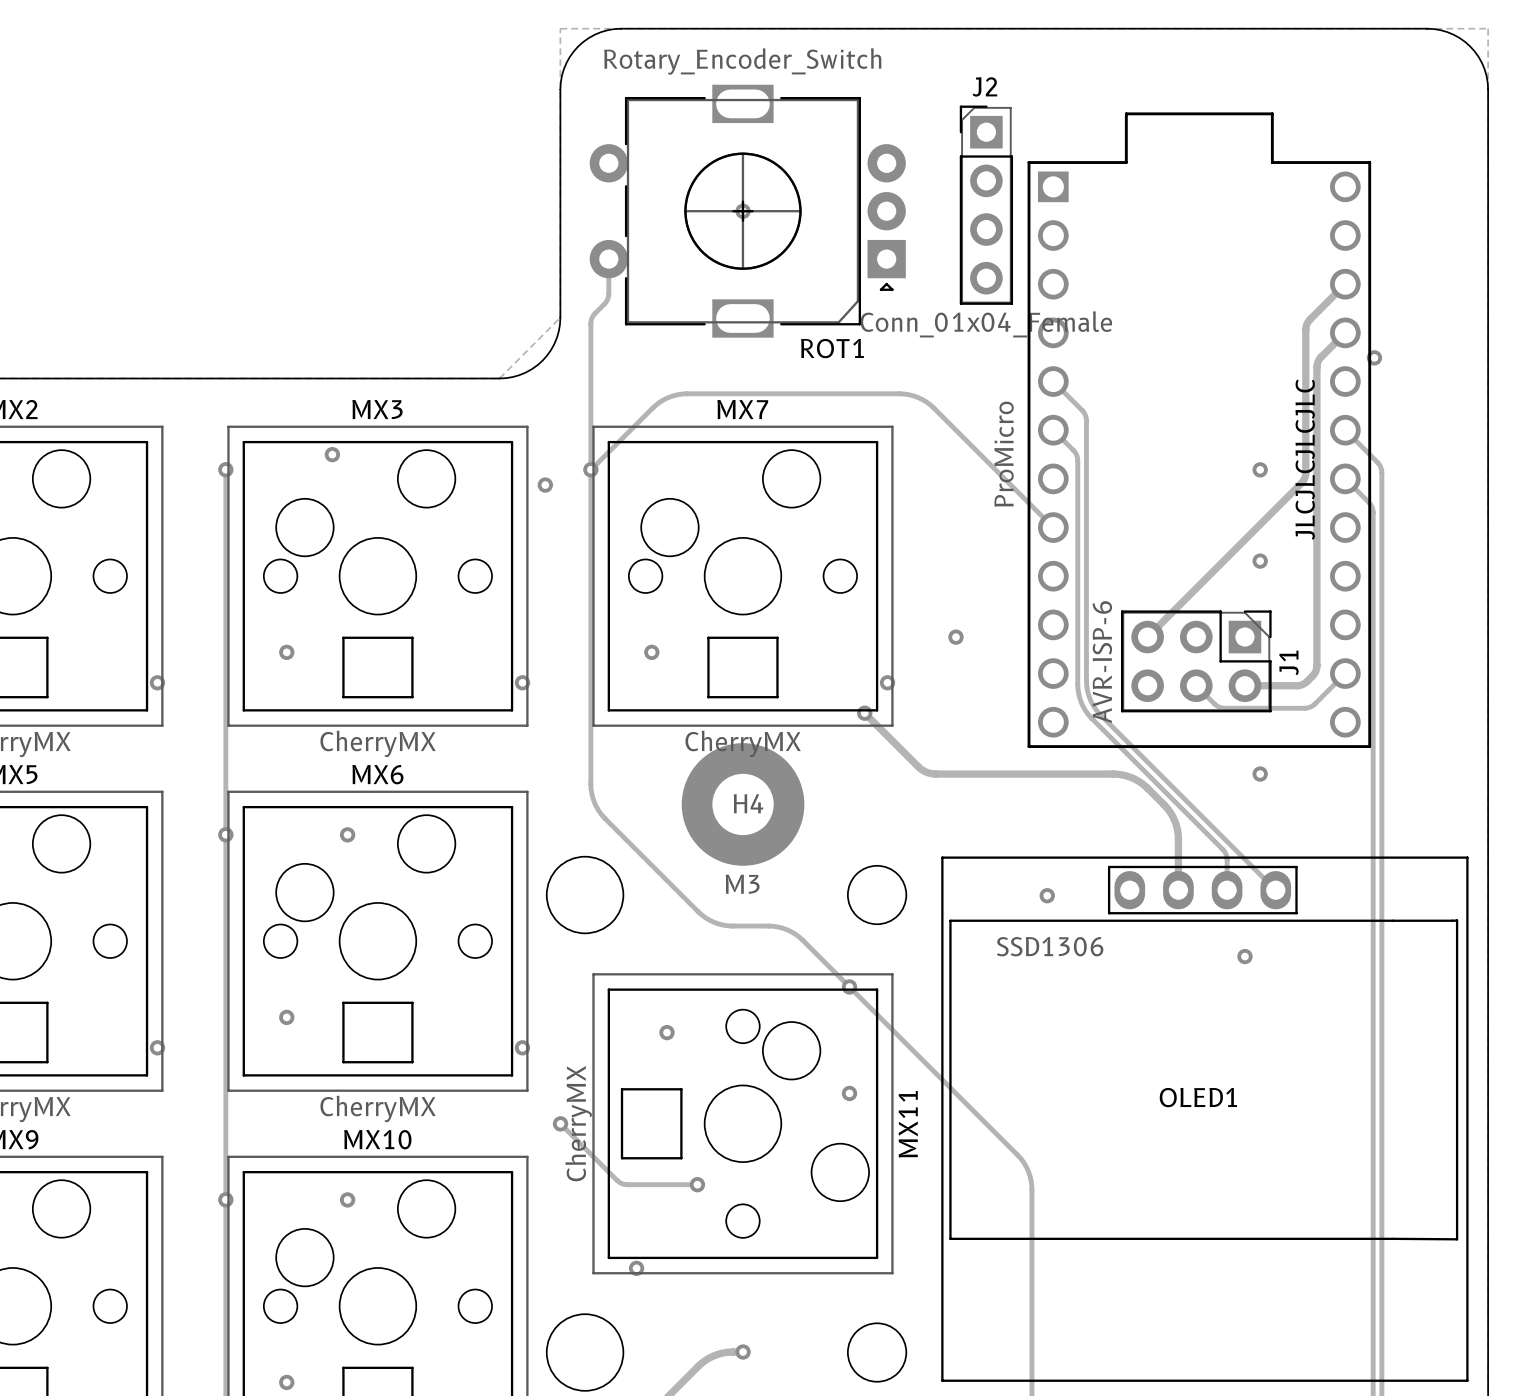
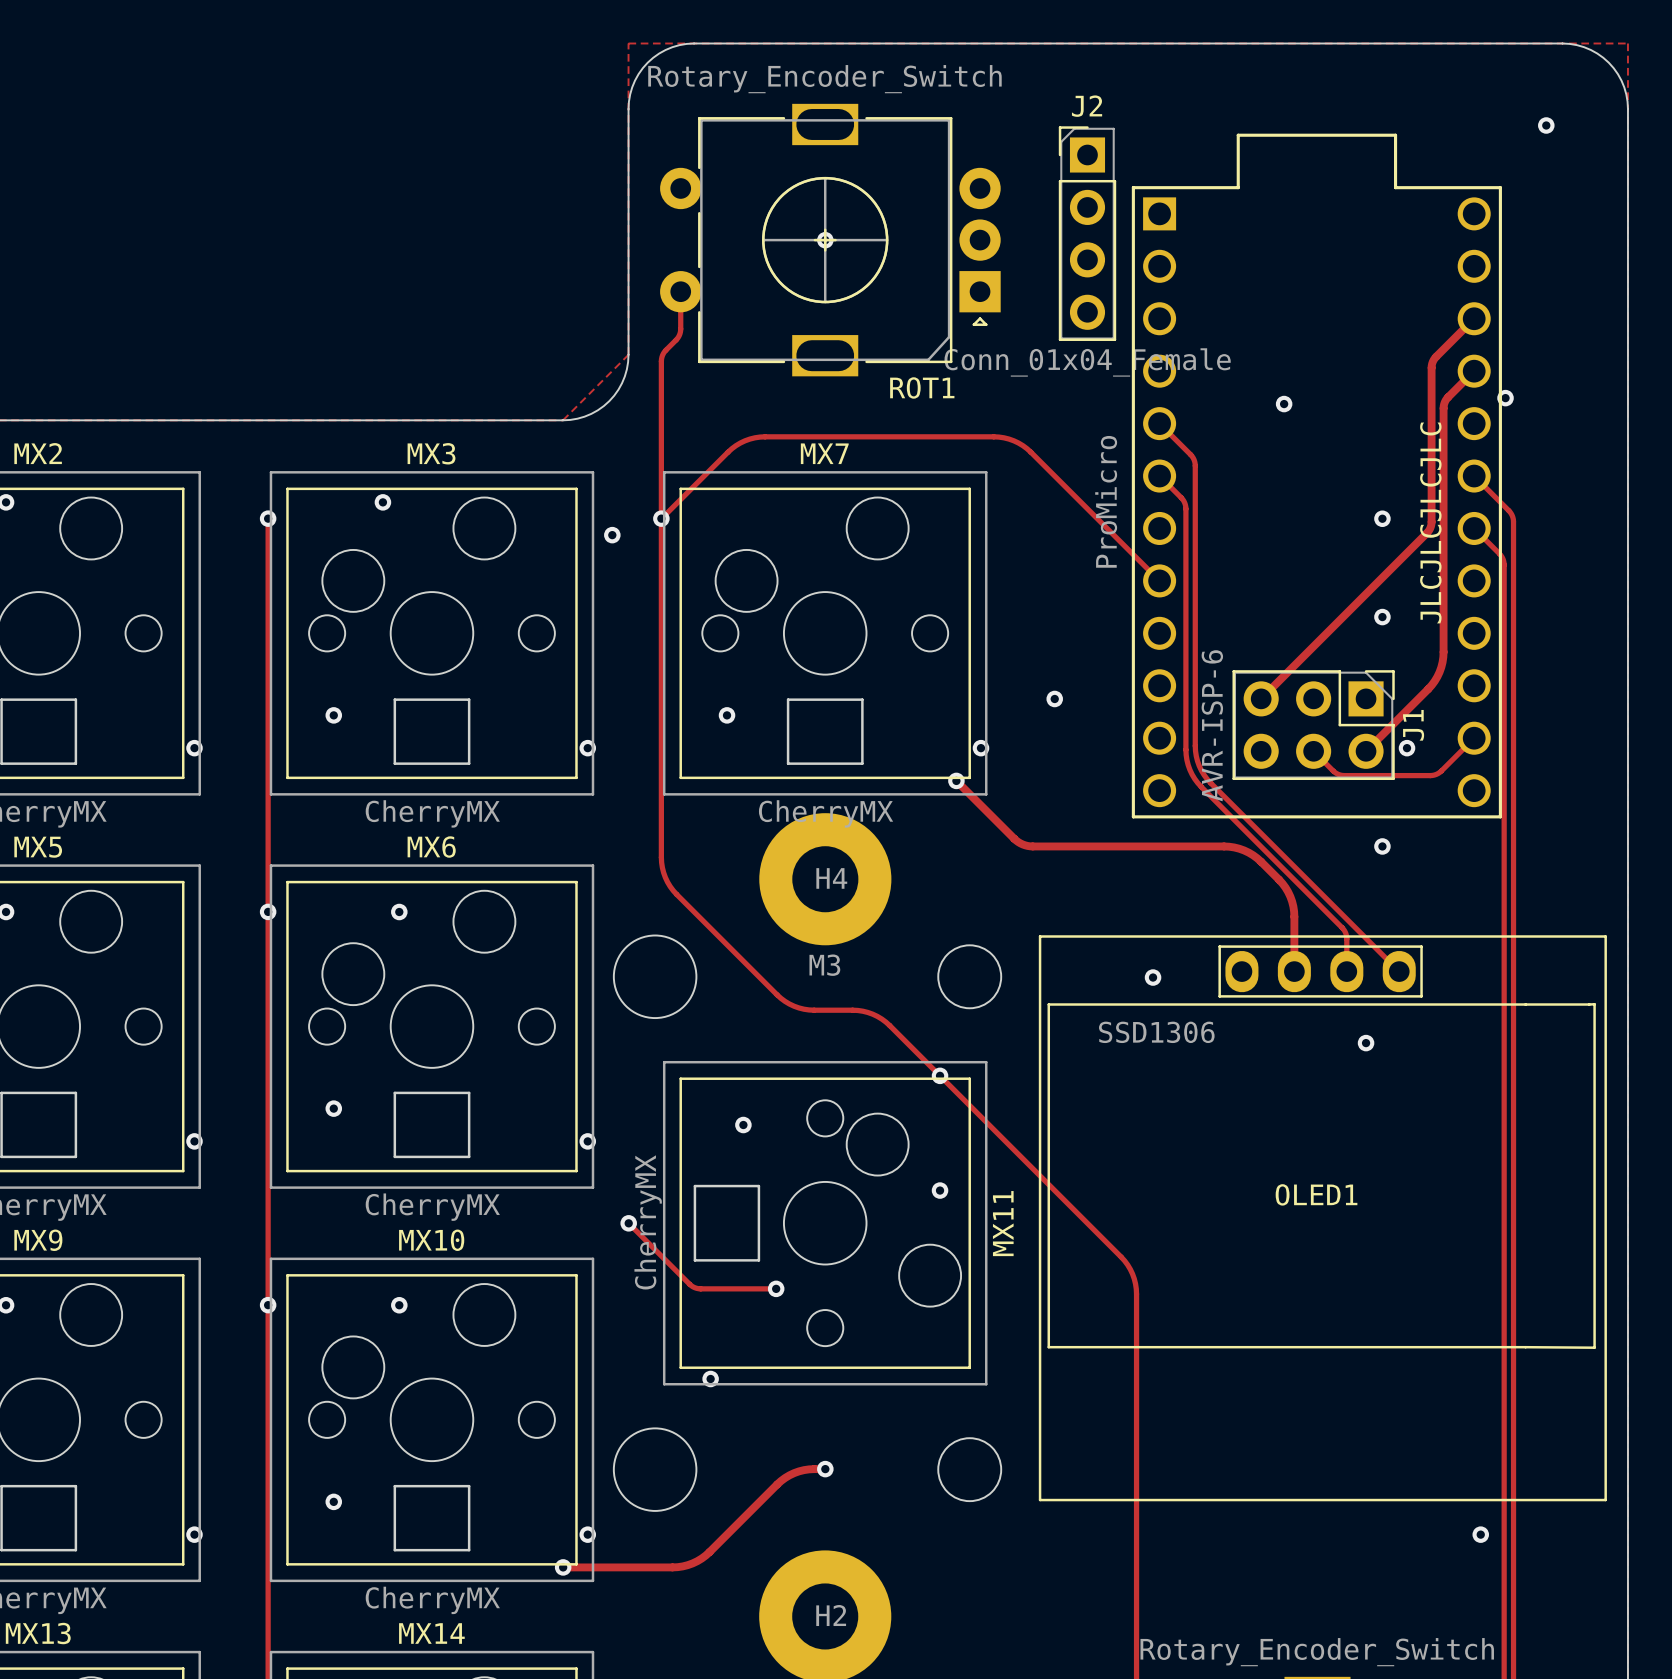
via: none -> (1546, 125)
via: none -> (1284, 404)
track: (1316, 593) (1316, 665) (1313, 674) (1305, 682) (1298, 685) (1244, 685) -> (1443, 652) (1439, 672) (1431, 685) (1366, 751)
via: none -> (1407, 748)

